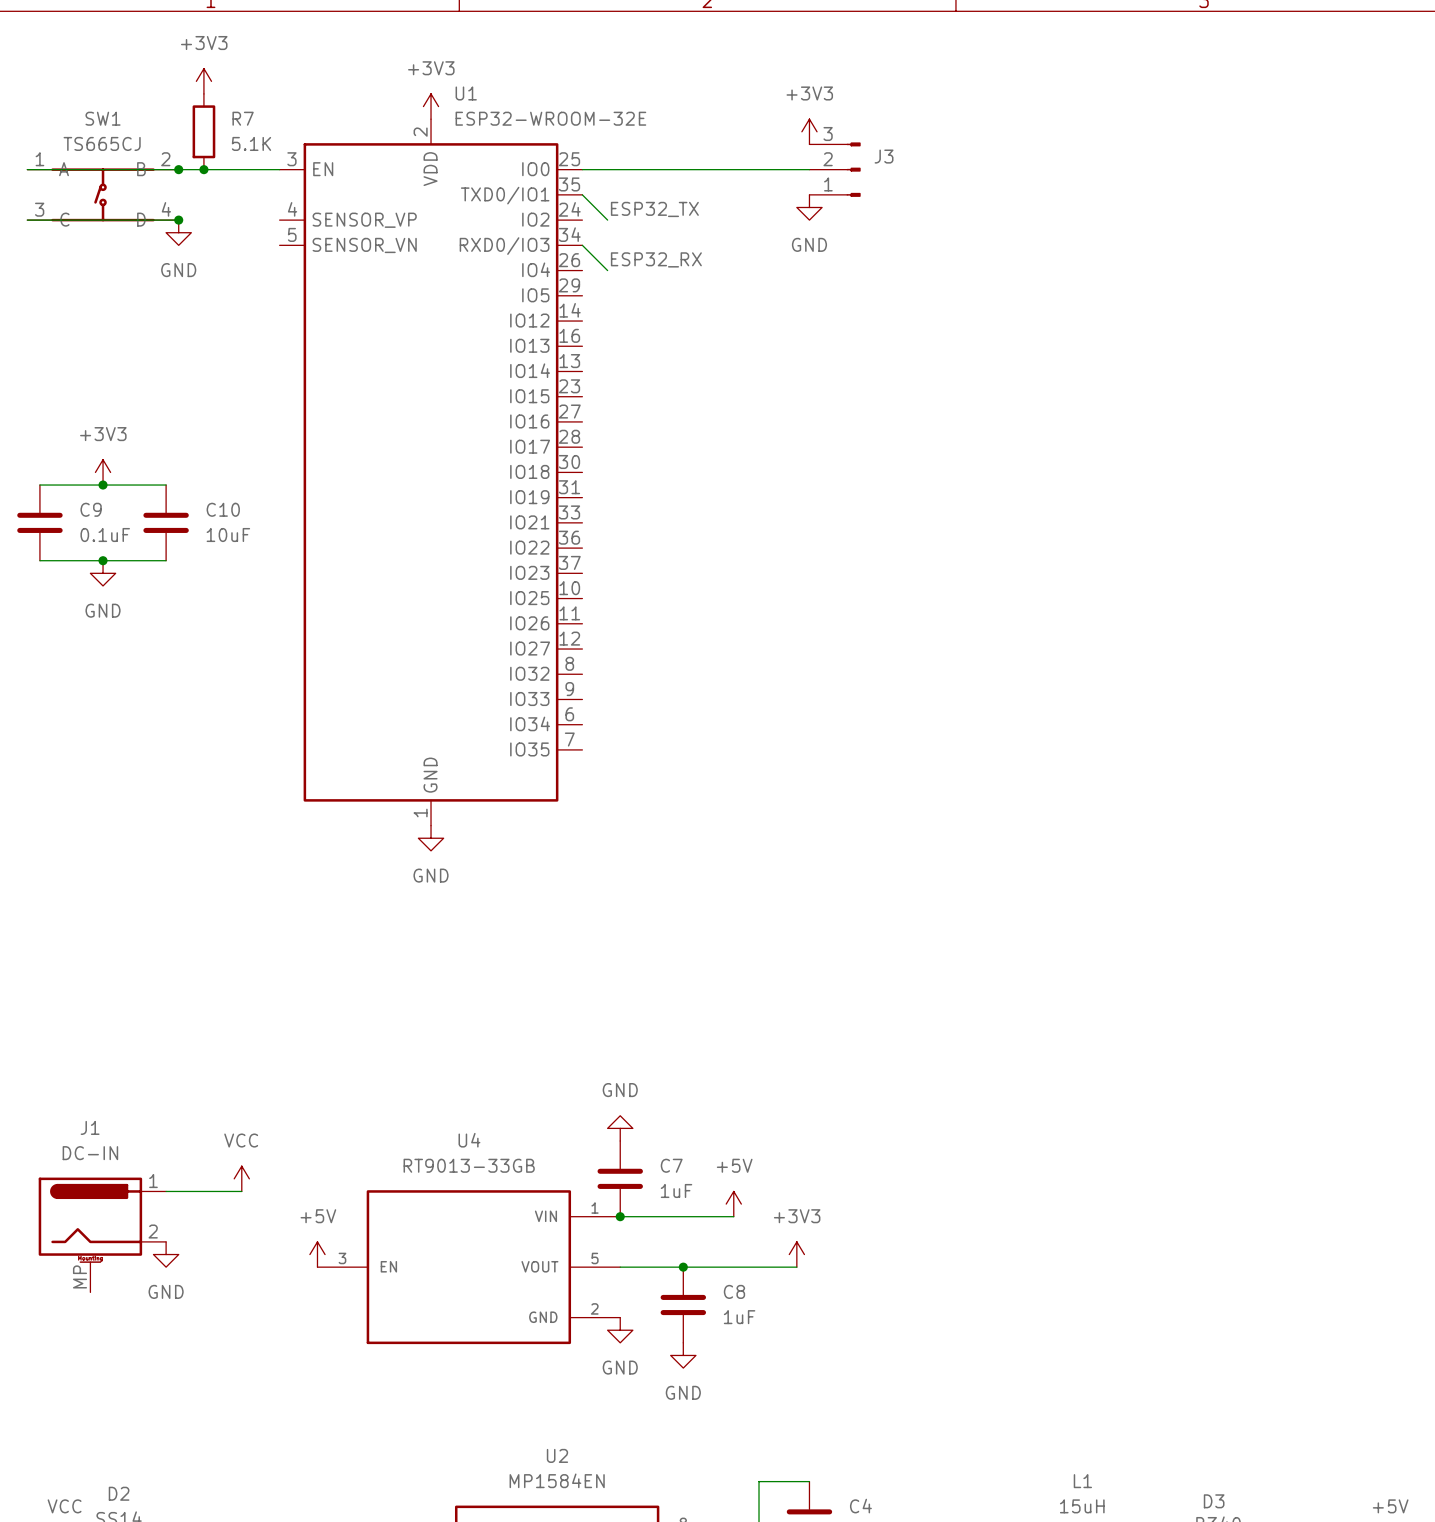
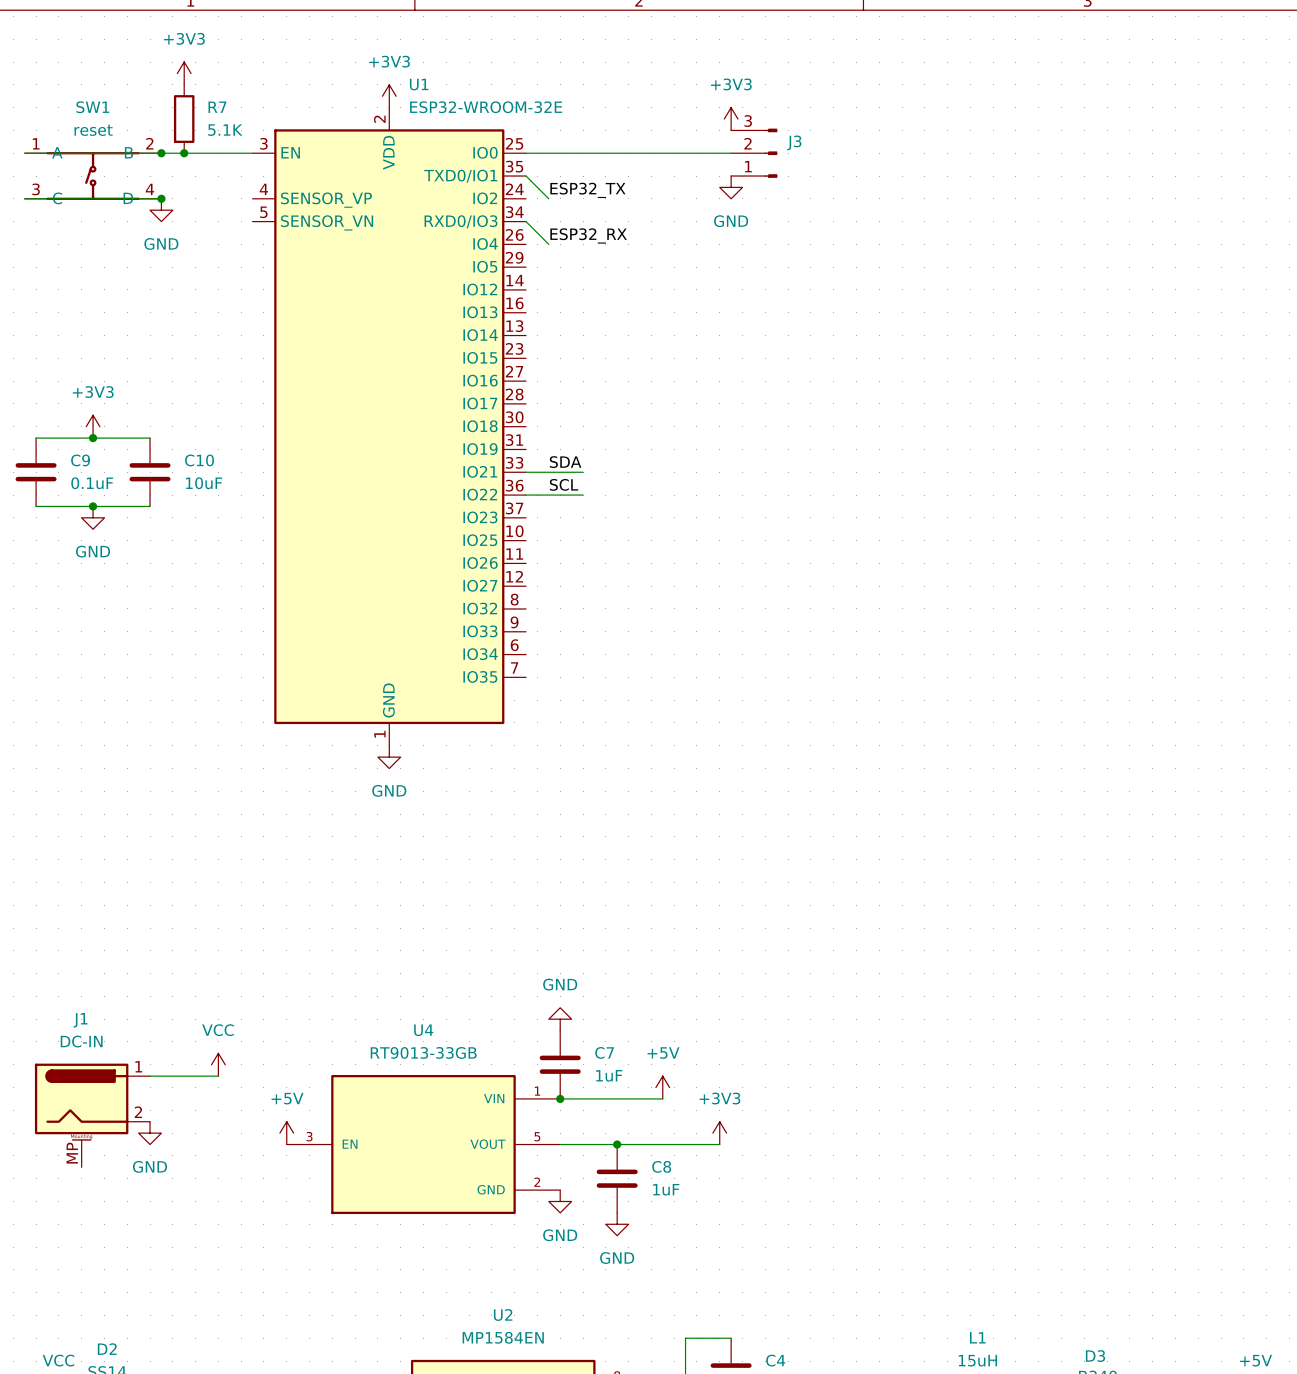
SW1 value: TS665CJ (102, 143) -> reset (93, 130)
label: none -> SDA (565, 462)
wire: none -> (526, 472) (583, 472)
label: none -> SCL (564, 484)
wire: none -> (526, 495) (583, 495)

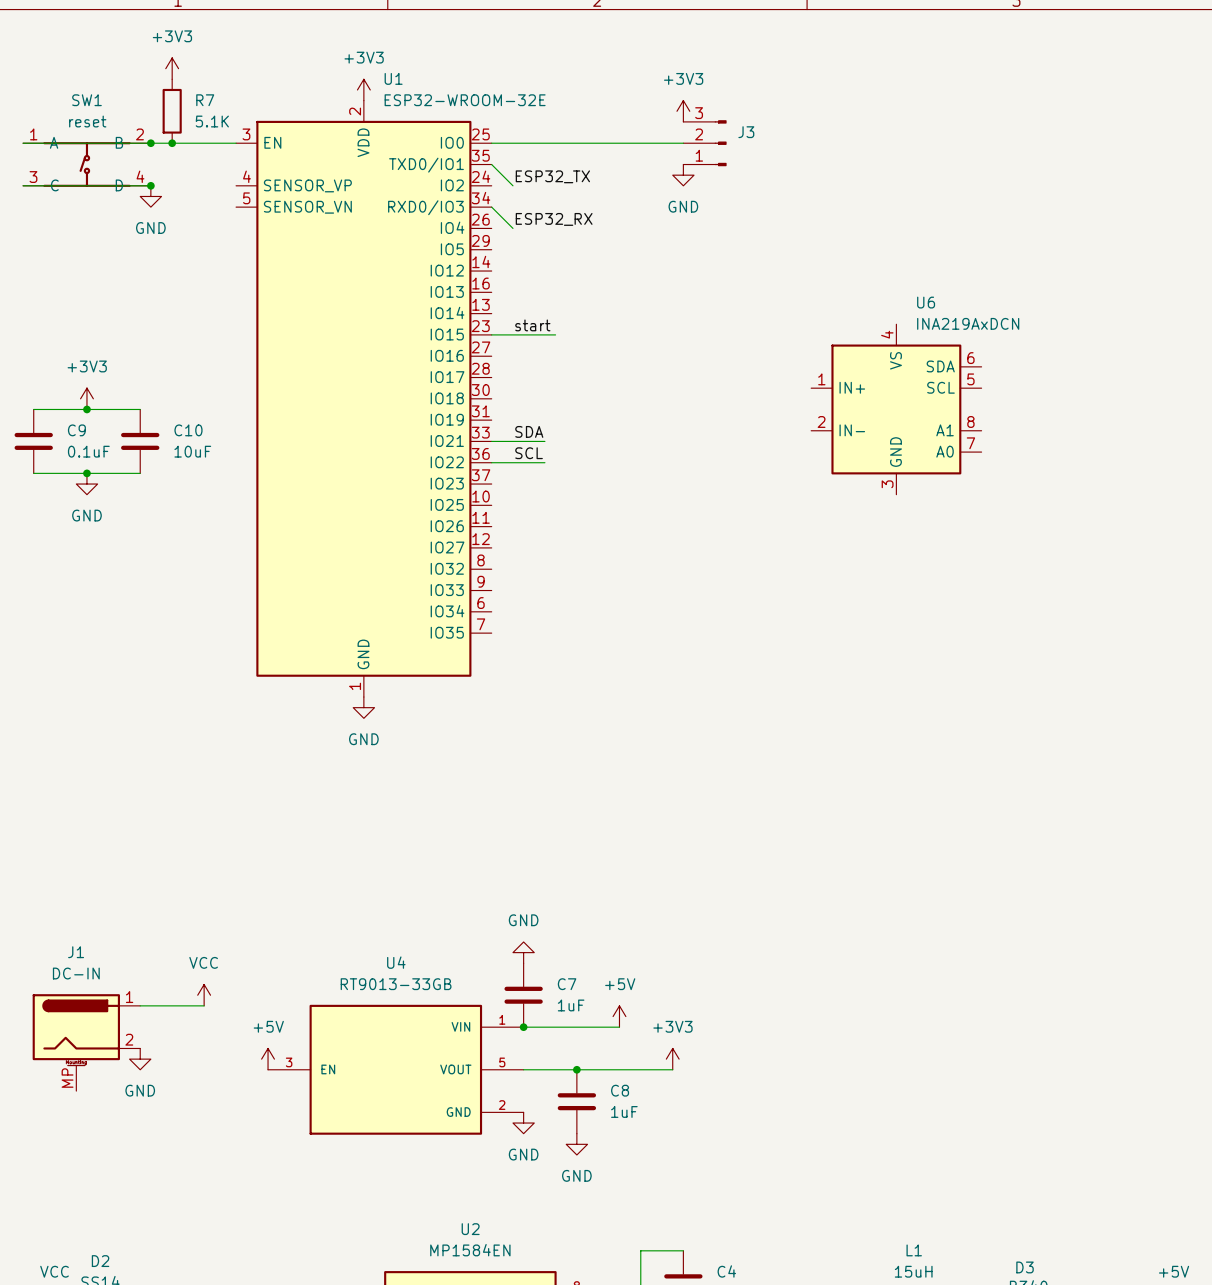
label: none -> start (532, 325)
wire: none -> (491, 334) (555, 334)
U6: none -> INA219AxDCN (896, 409)

